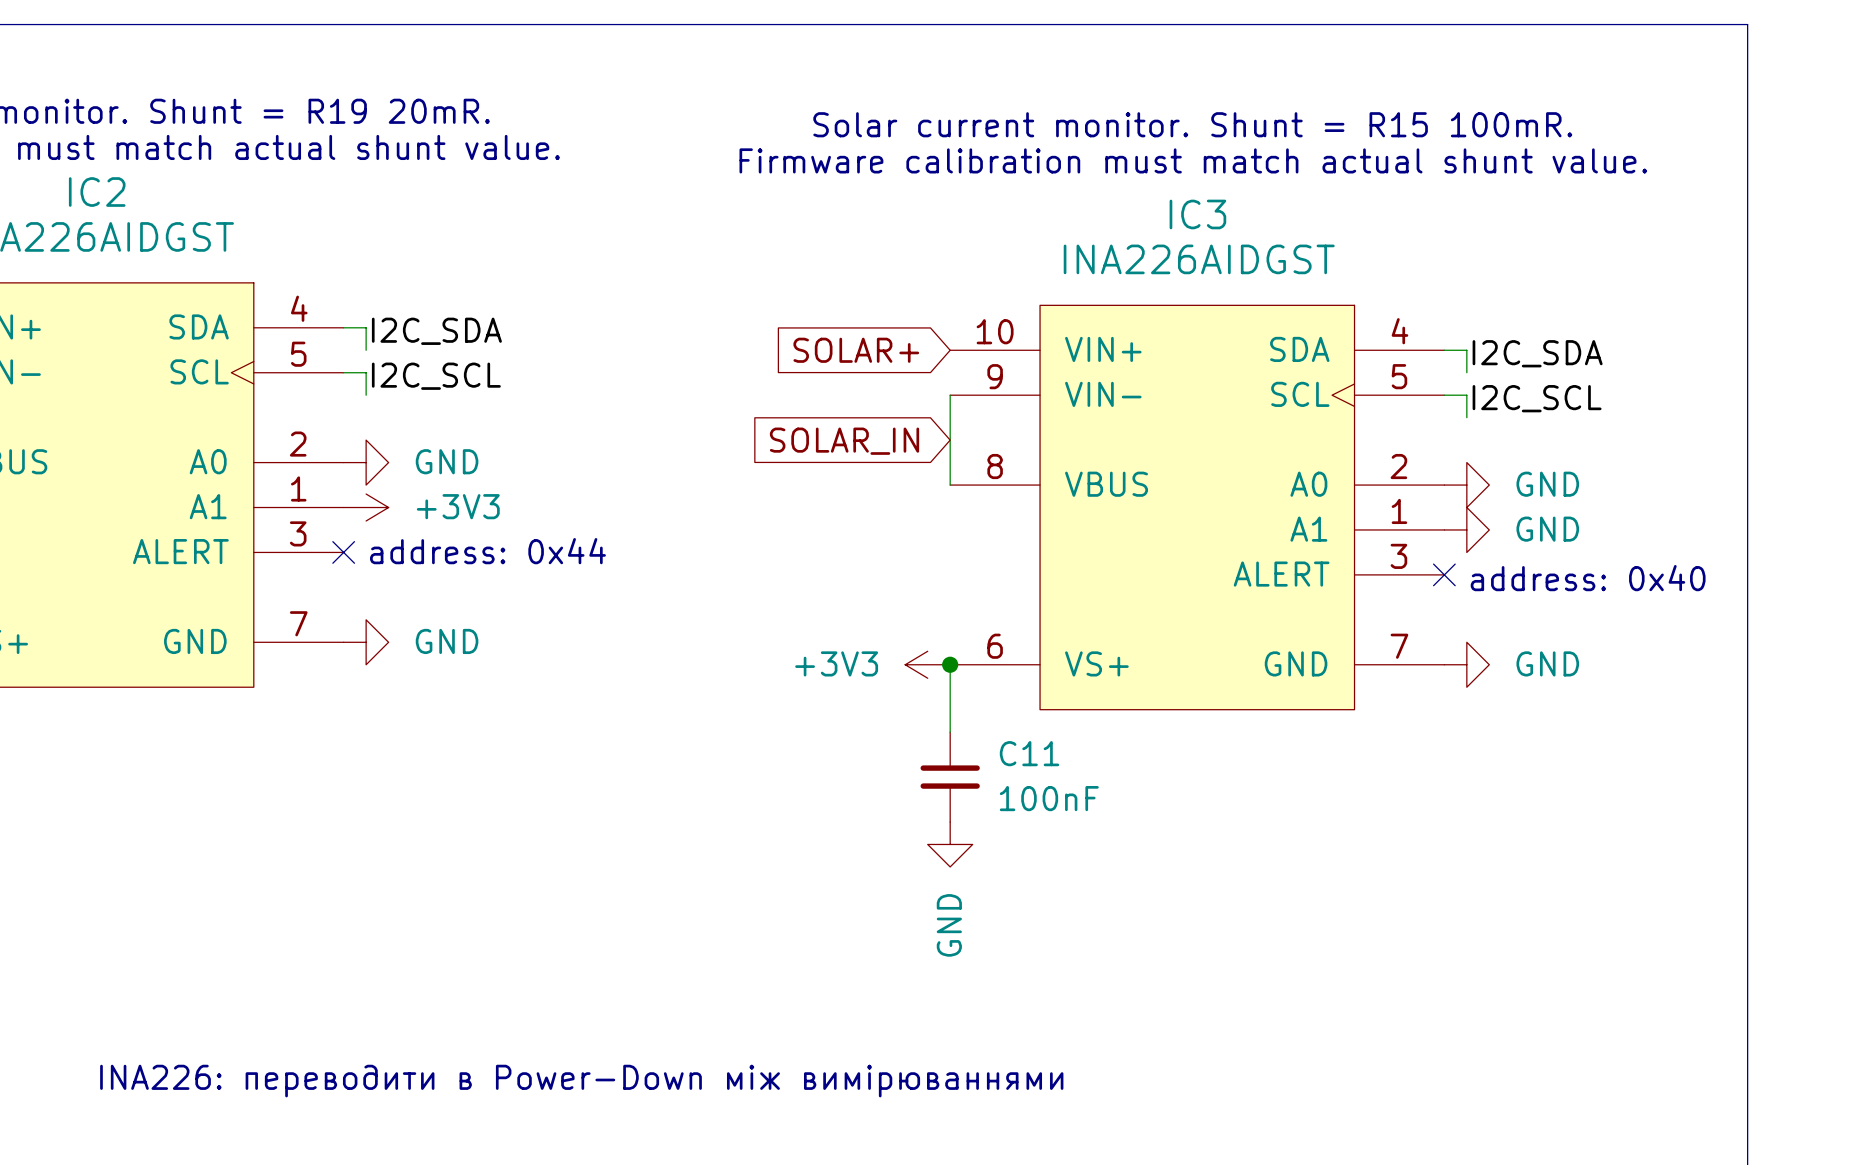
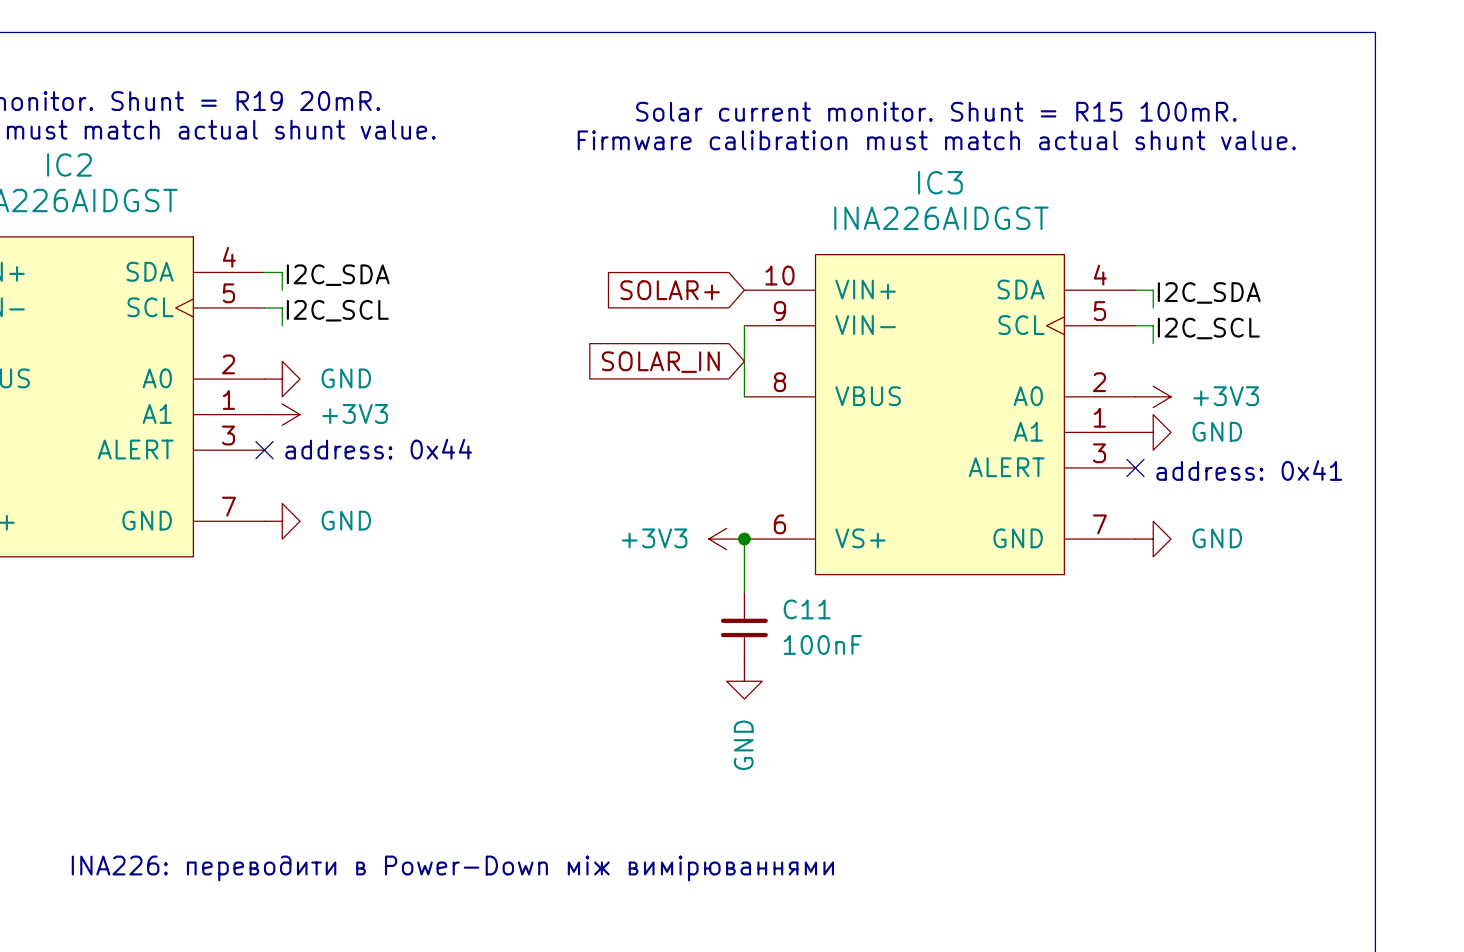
power symbol: GND (1466, 485) -> +3V3 (1153, 396)
text: address: 0x40 (1588, 578) -> address: 0x41 (1249, 470)

